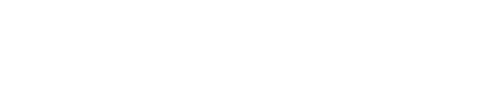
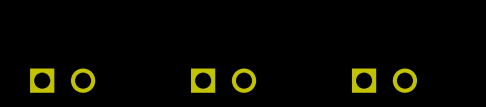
part: none -> (62, 80)
part: none -> (223, 80)
part: none -> (384, 80)

